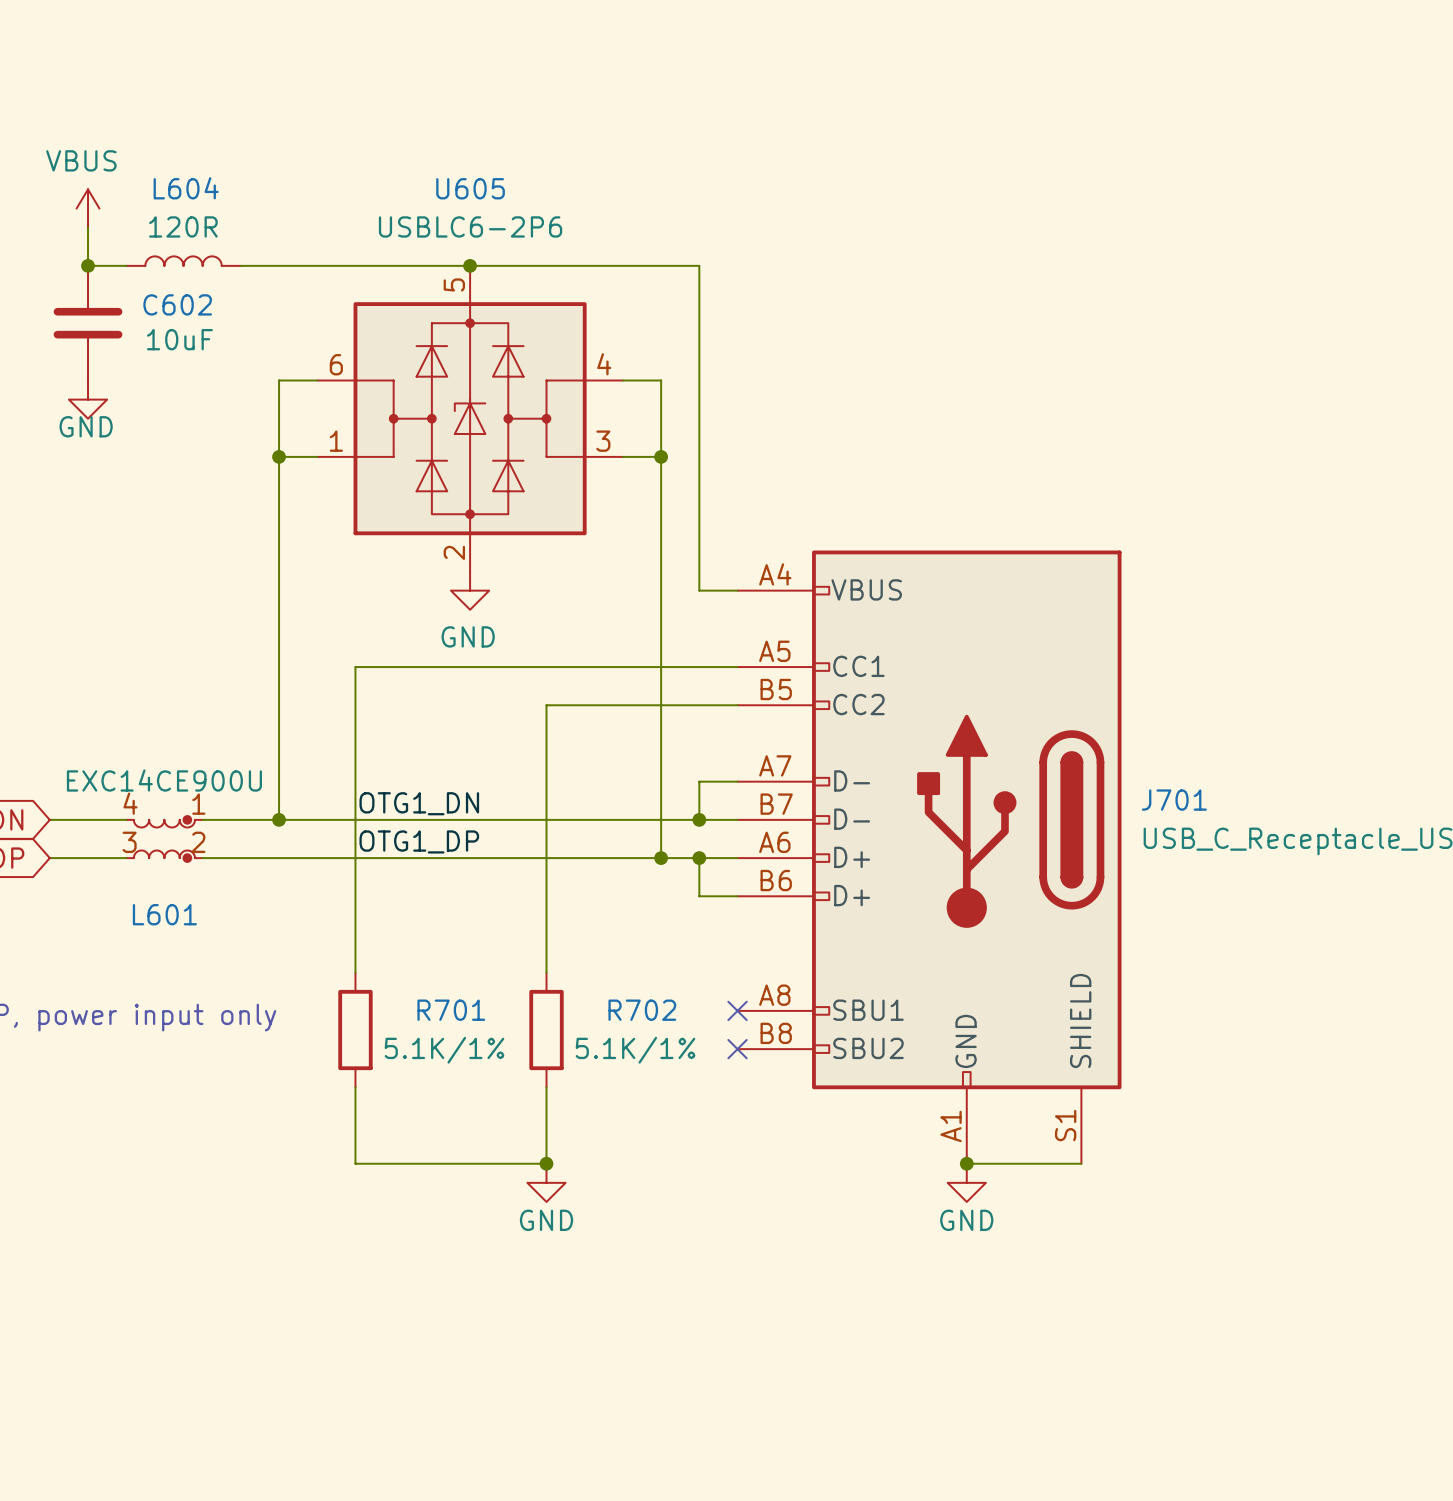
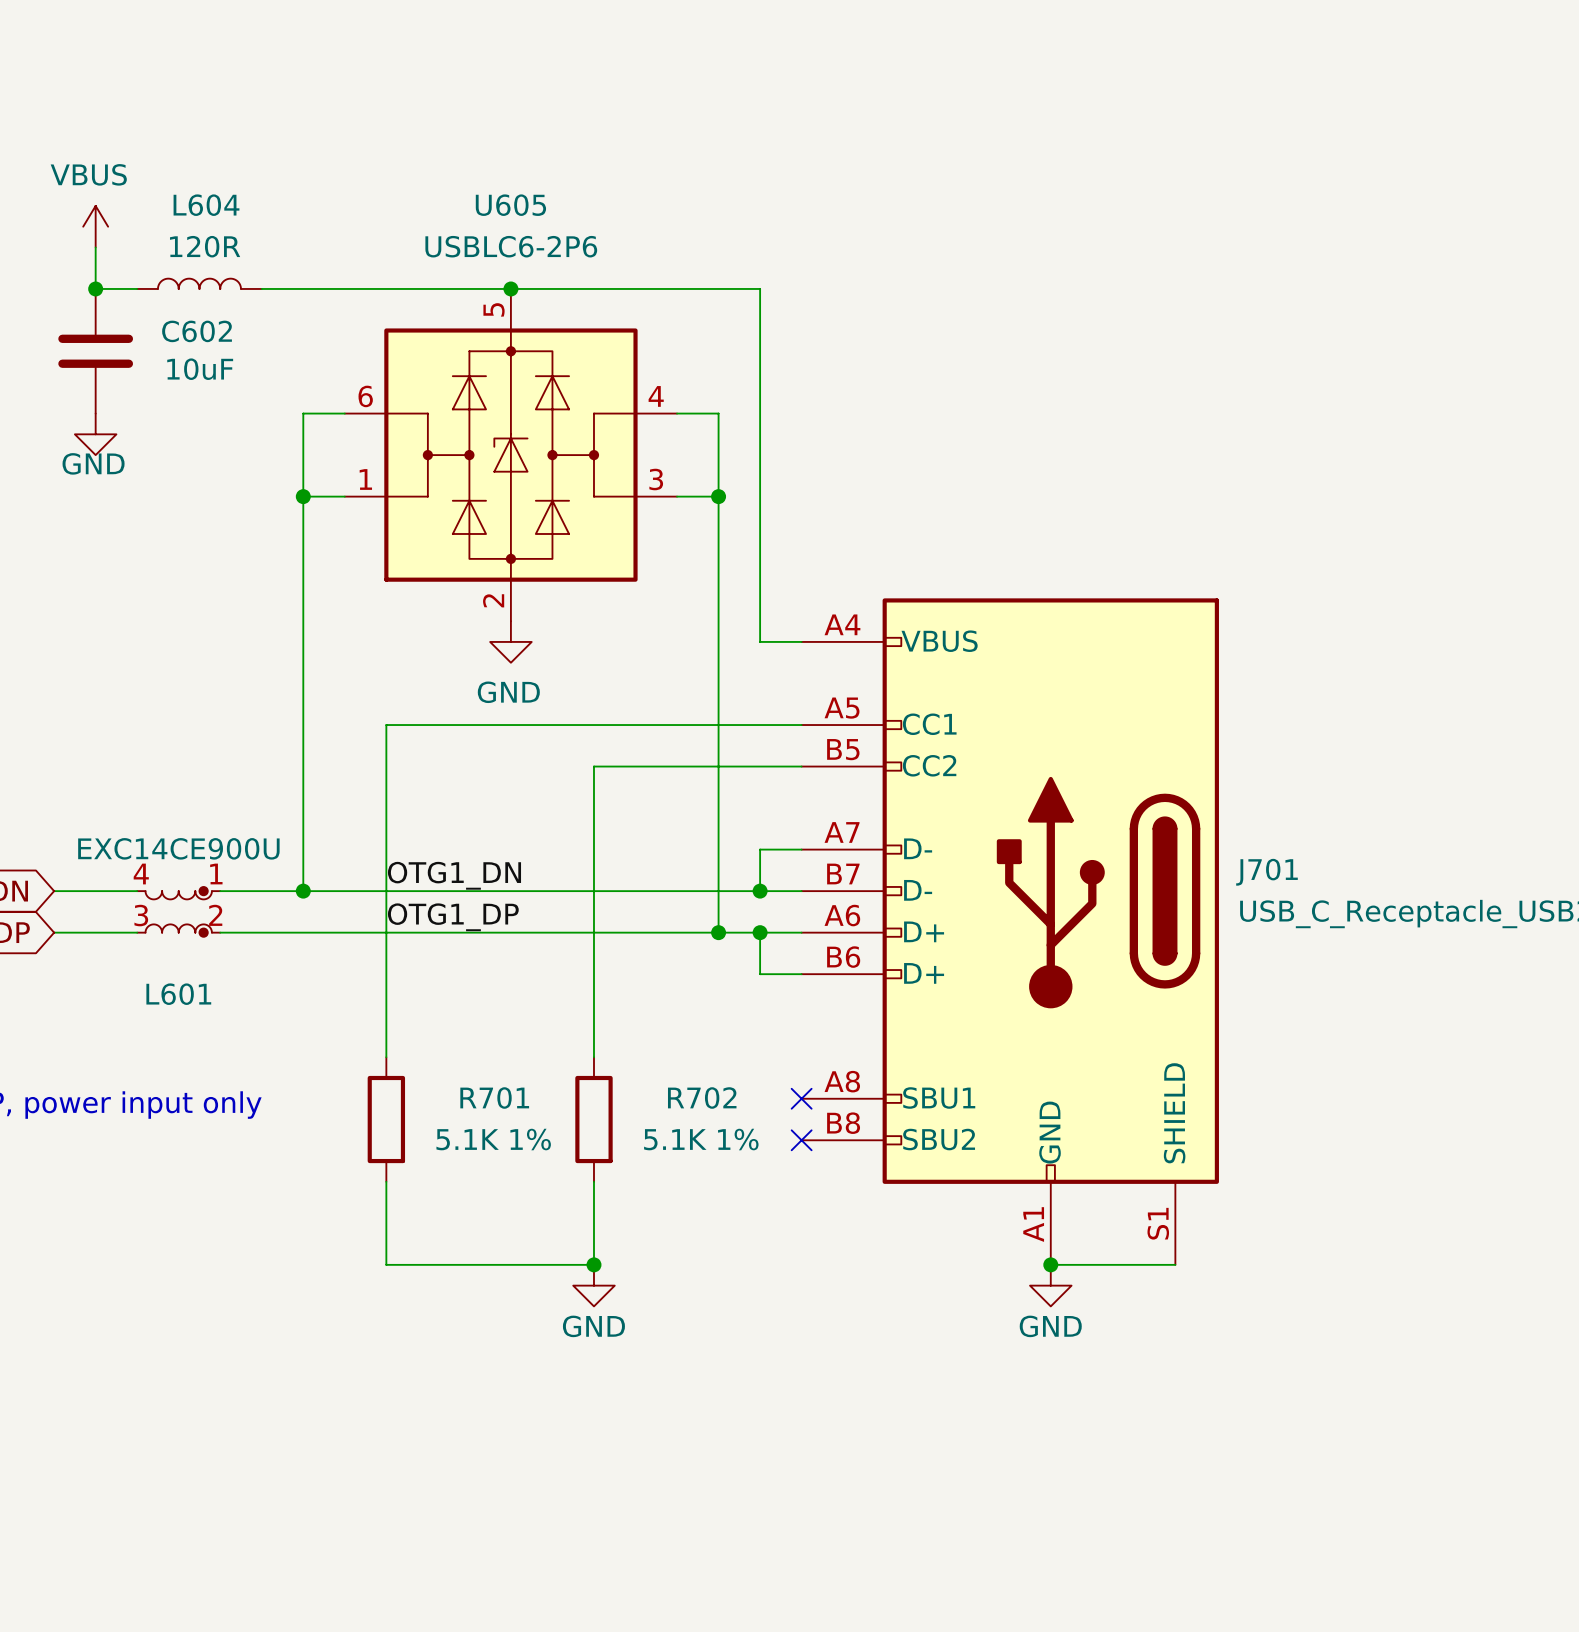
R701 value: 5.1K/1% (444, 1050) -> 5.1K 1% (493, 1139)
R702 value: 5.1K/1% (635, 1050) -> 5.1K 1% (701, 1139)

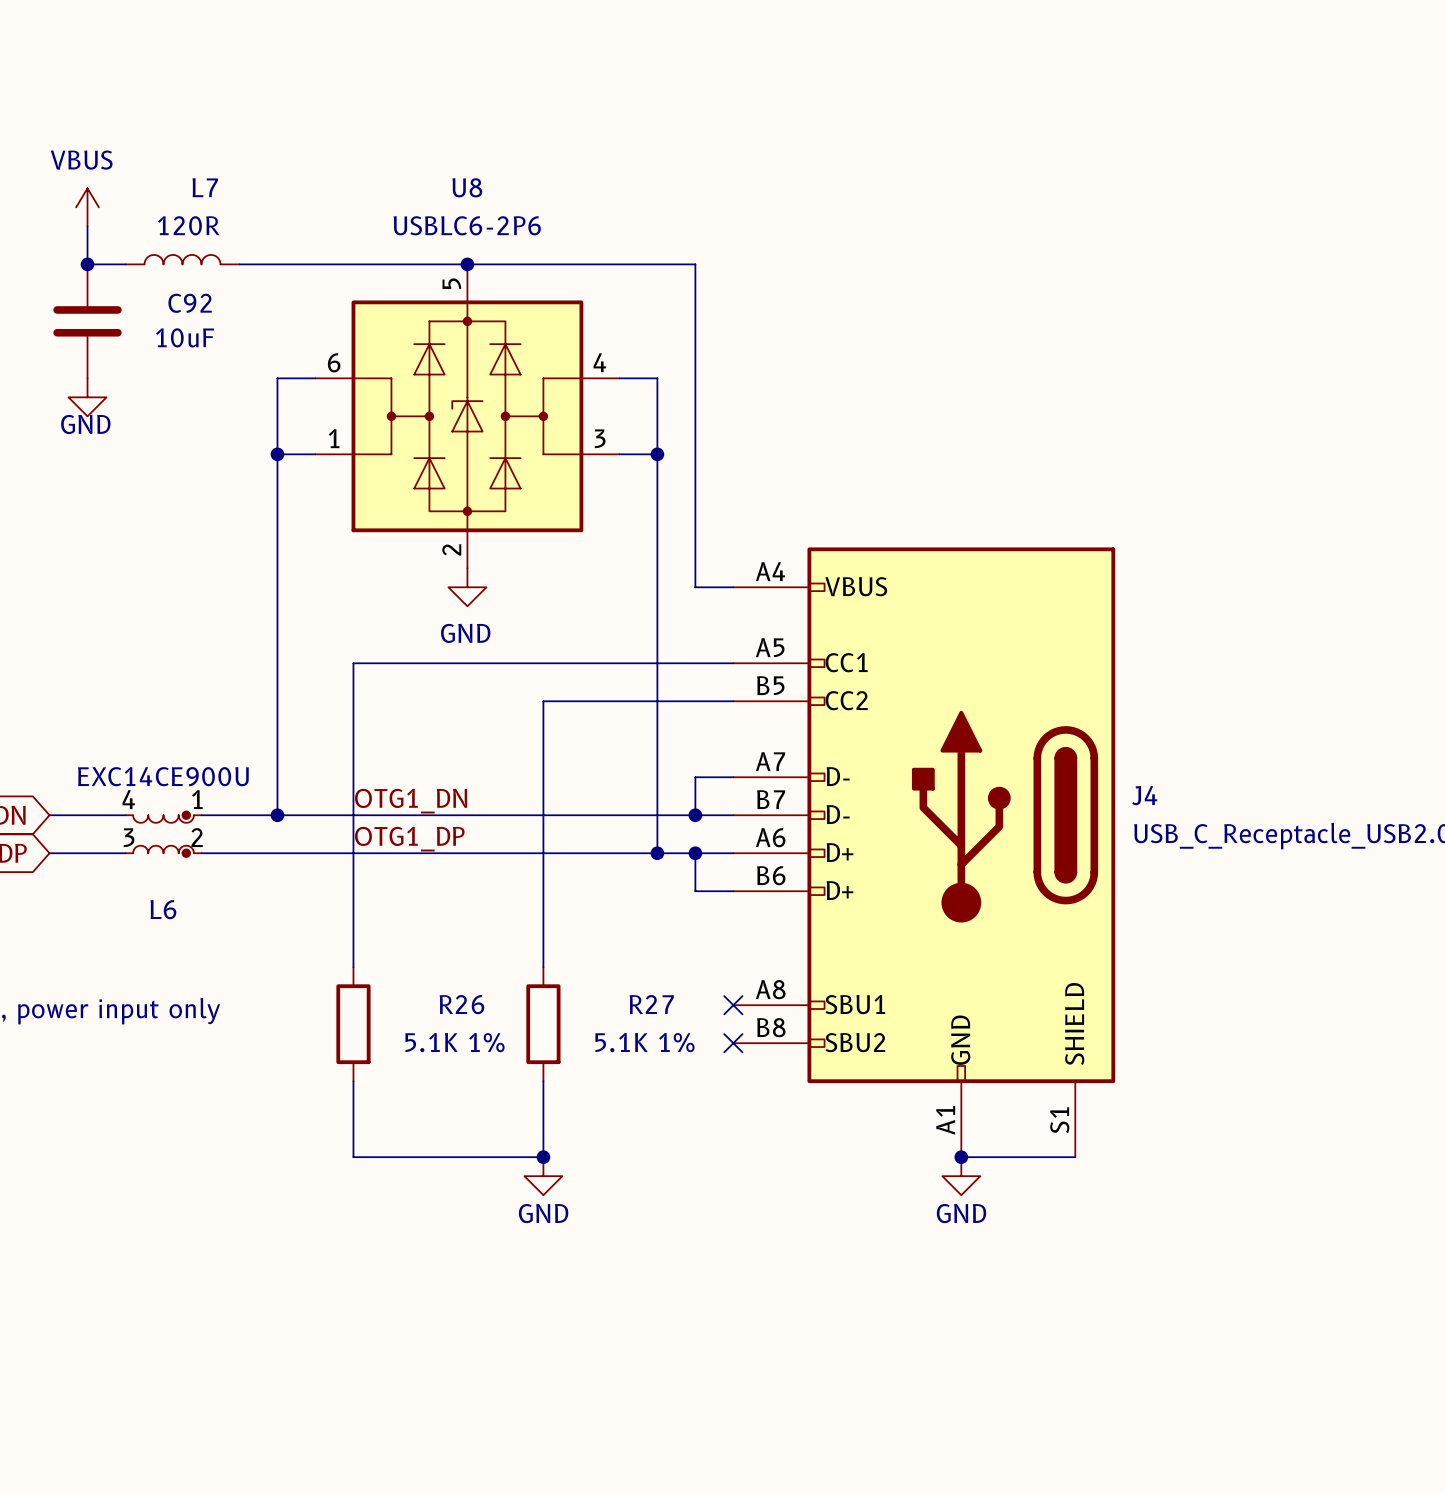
L604 name: L604 (206, 205) -> L7 (205, 187)
U605 name: U605 (510, 205) -> U8 (467, 187)
C602 name: C602 (197, 331) -> C92 (190, 303)
J701 name: J701 (1266, 872) -> J4 (1144, 795)
L601 name: L601 (178, 994) -> L6 (163, 909)
R701 name: R701 (494, 1098) -> R26 (461, 1004)
R702 name: R702 (702, 1098) -> R27 (651, 1004)

